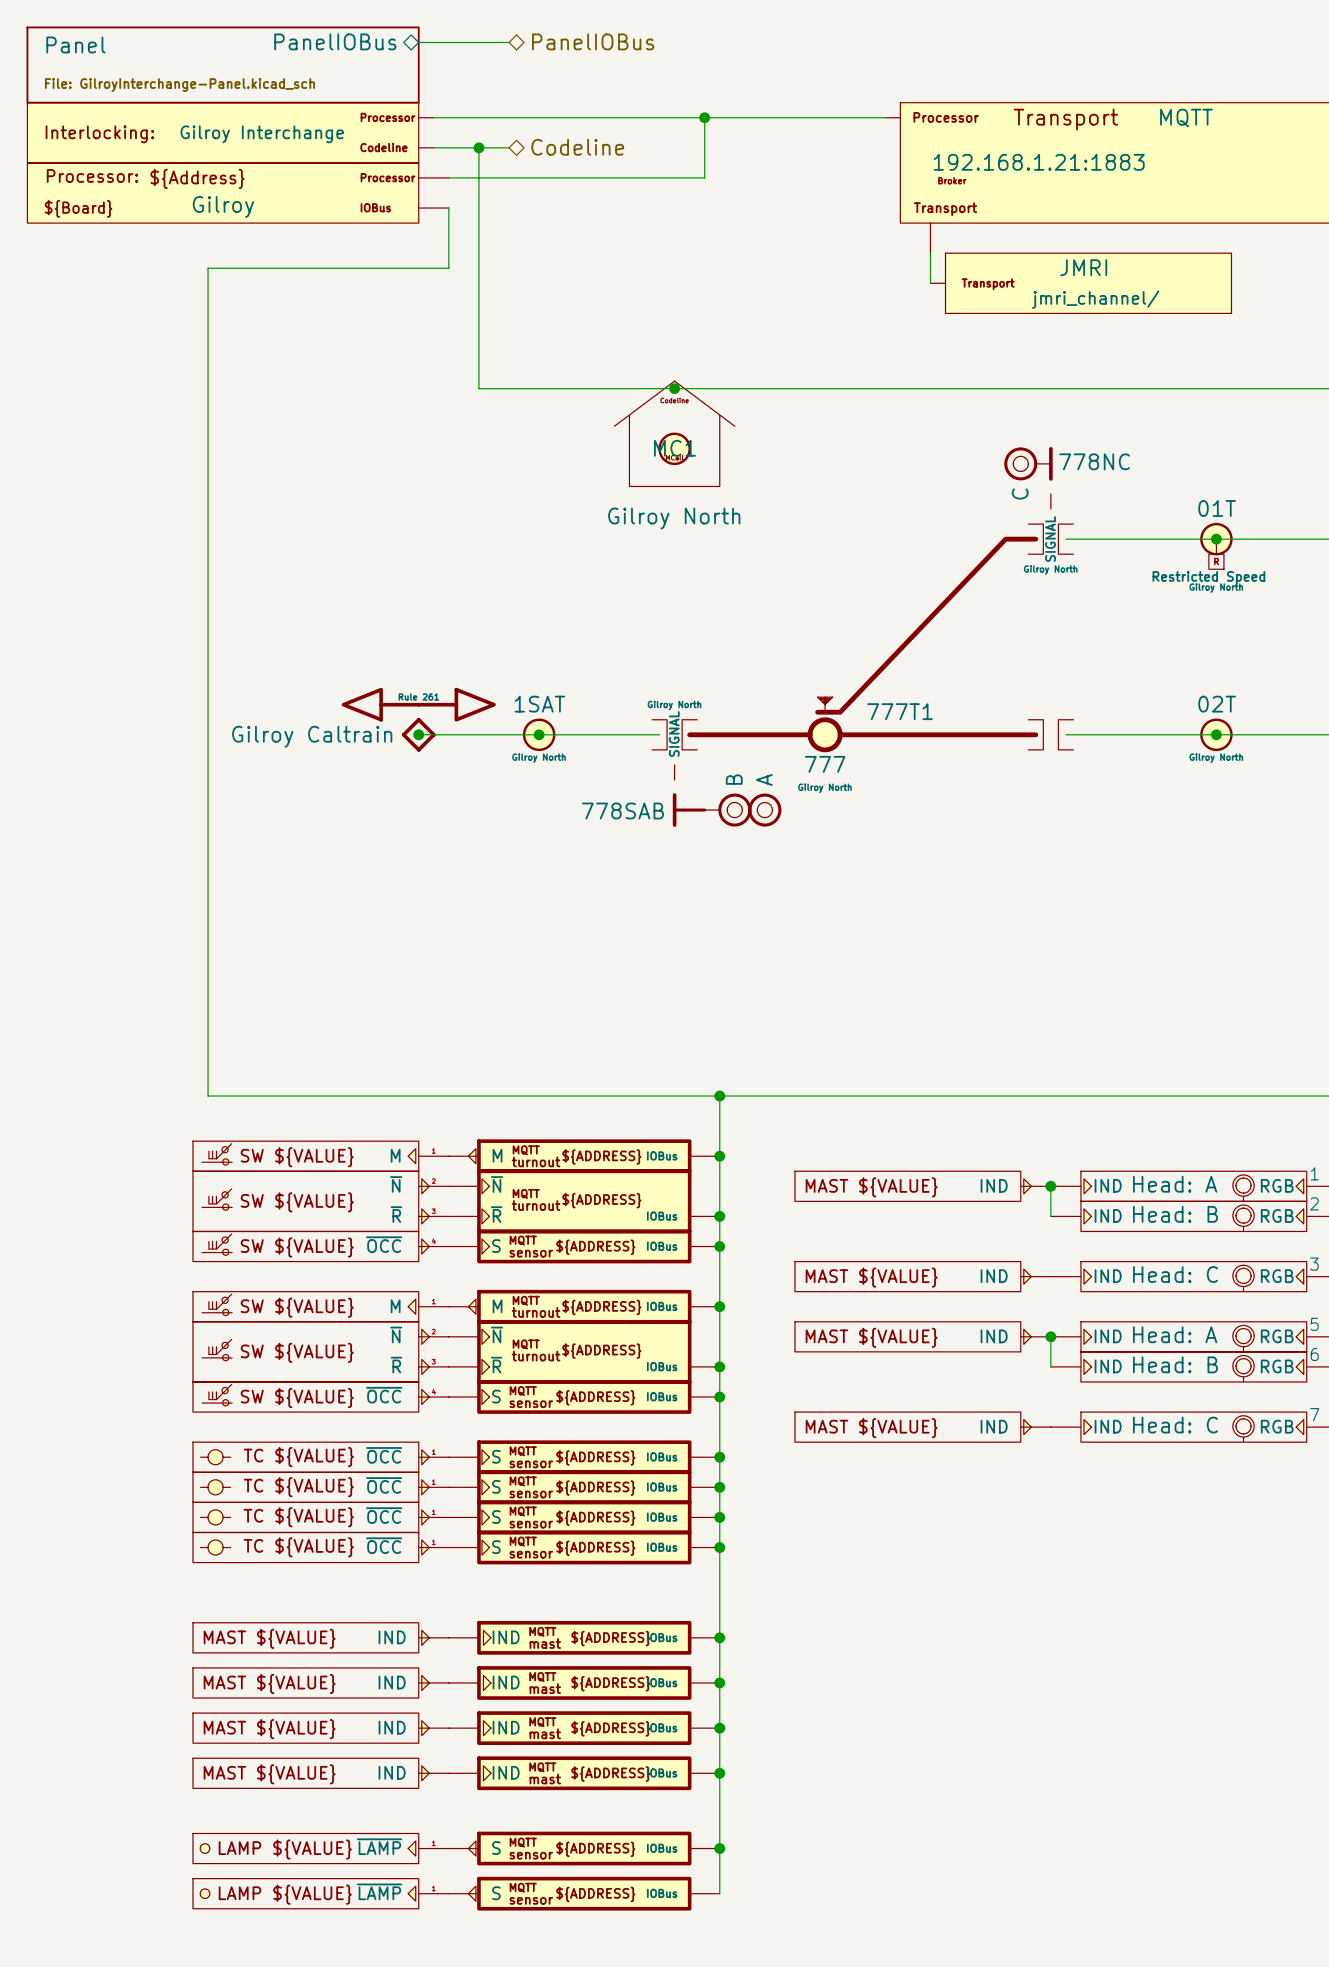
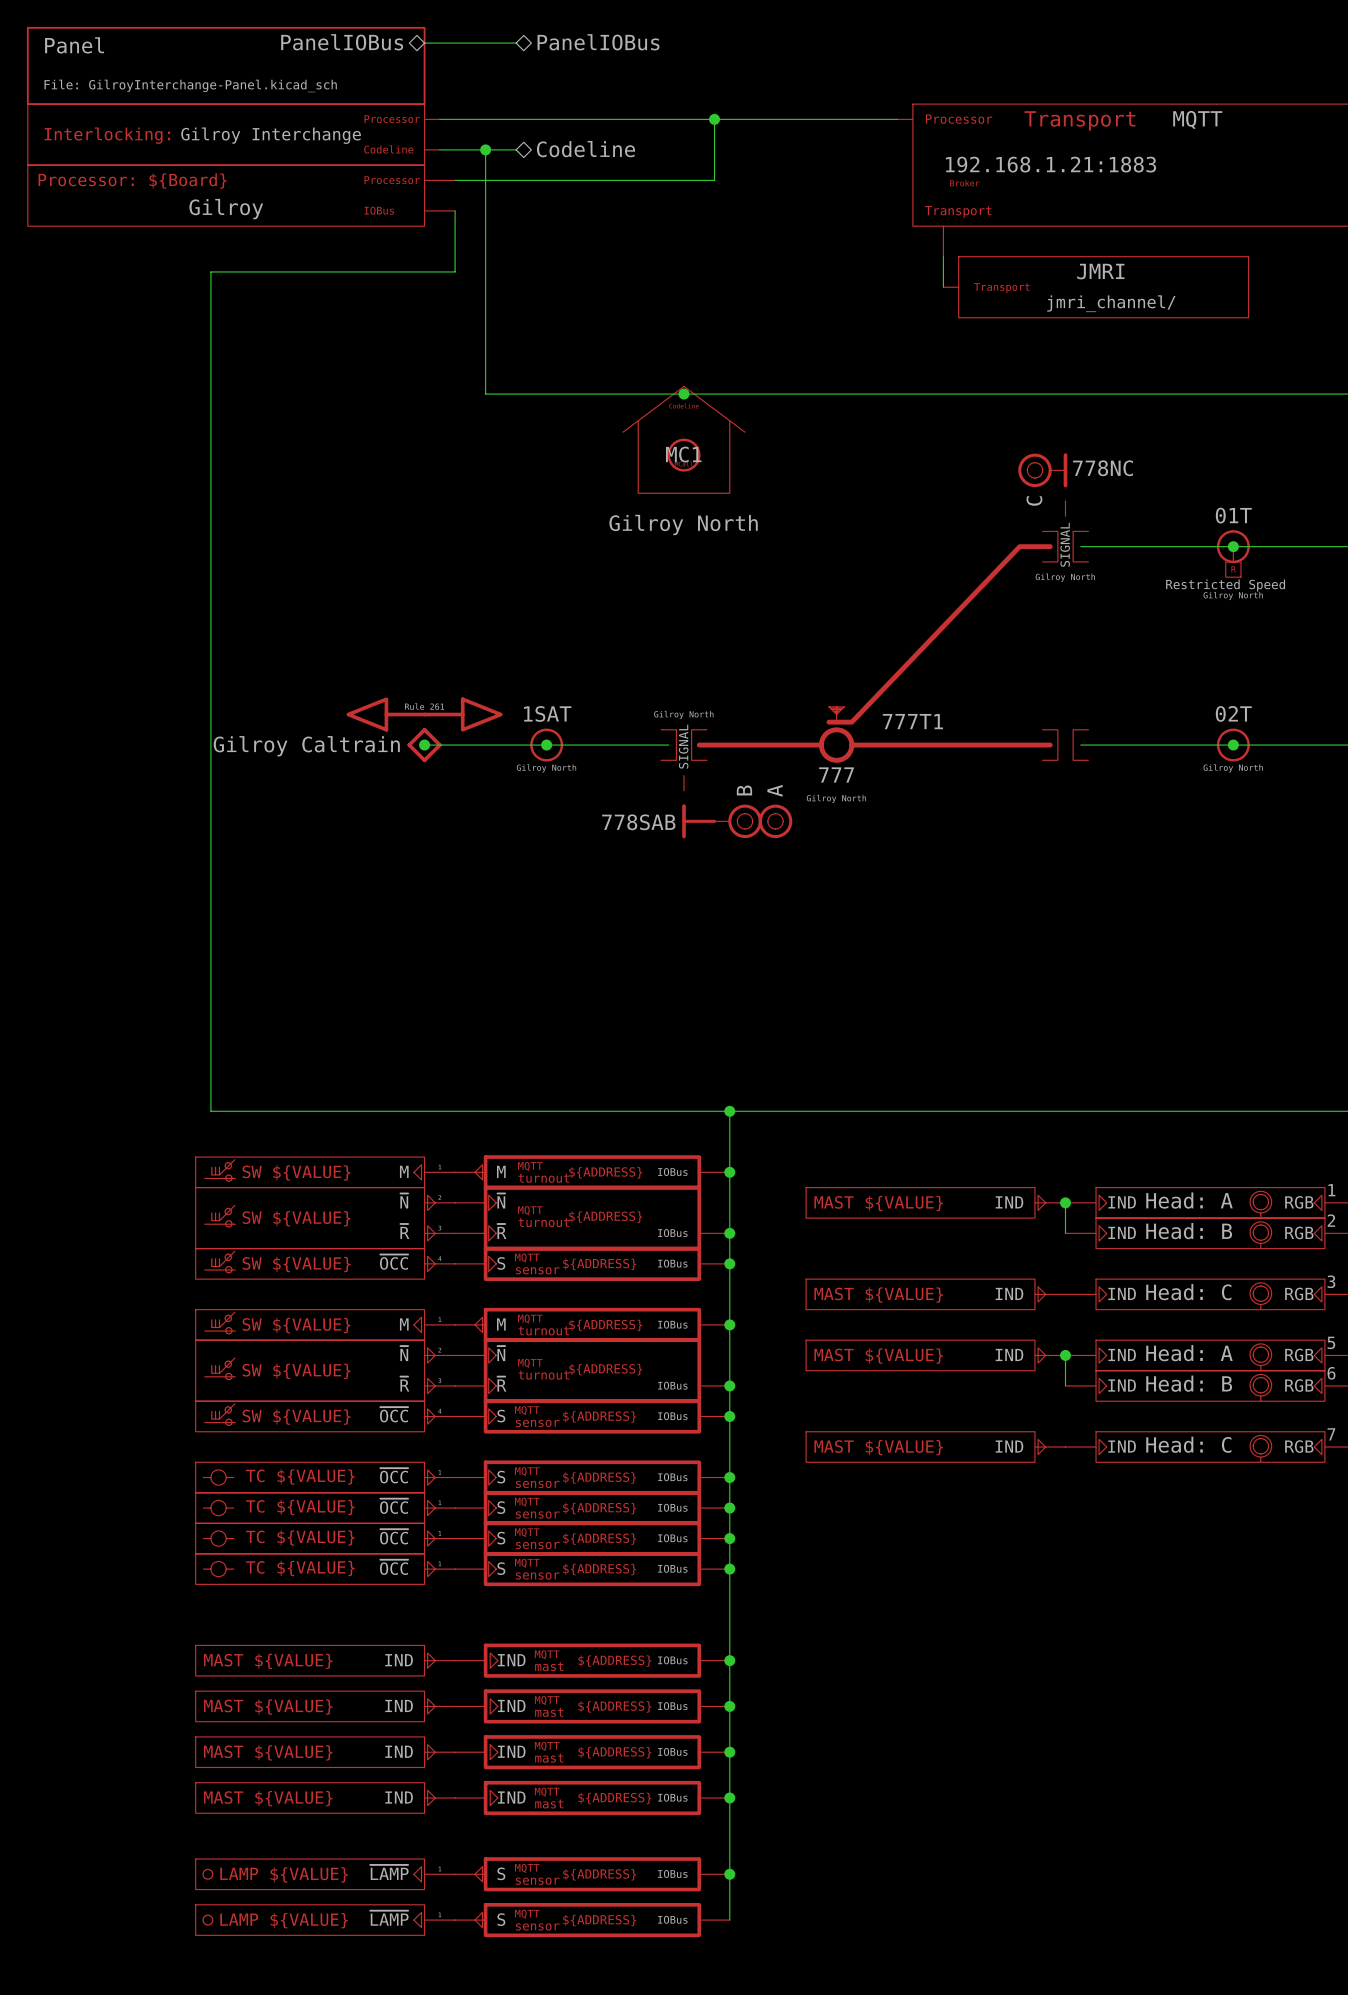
part text: Processor: (92, 175) -> none
part text: none -> Processor: ${Board} (132, 181)
part text: ${Address} (197, 178) -> none
part text: ${Board} (78, 208) -> none

